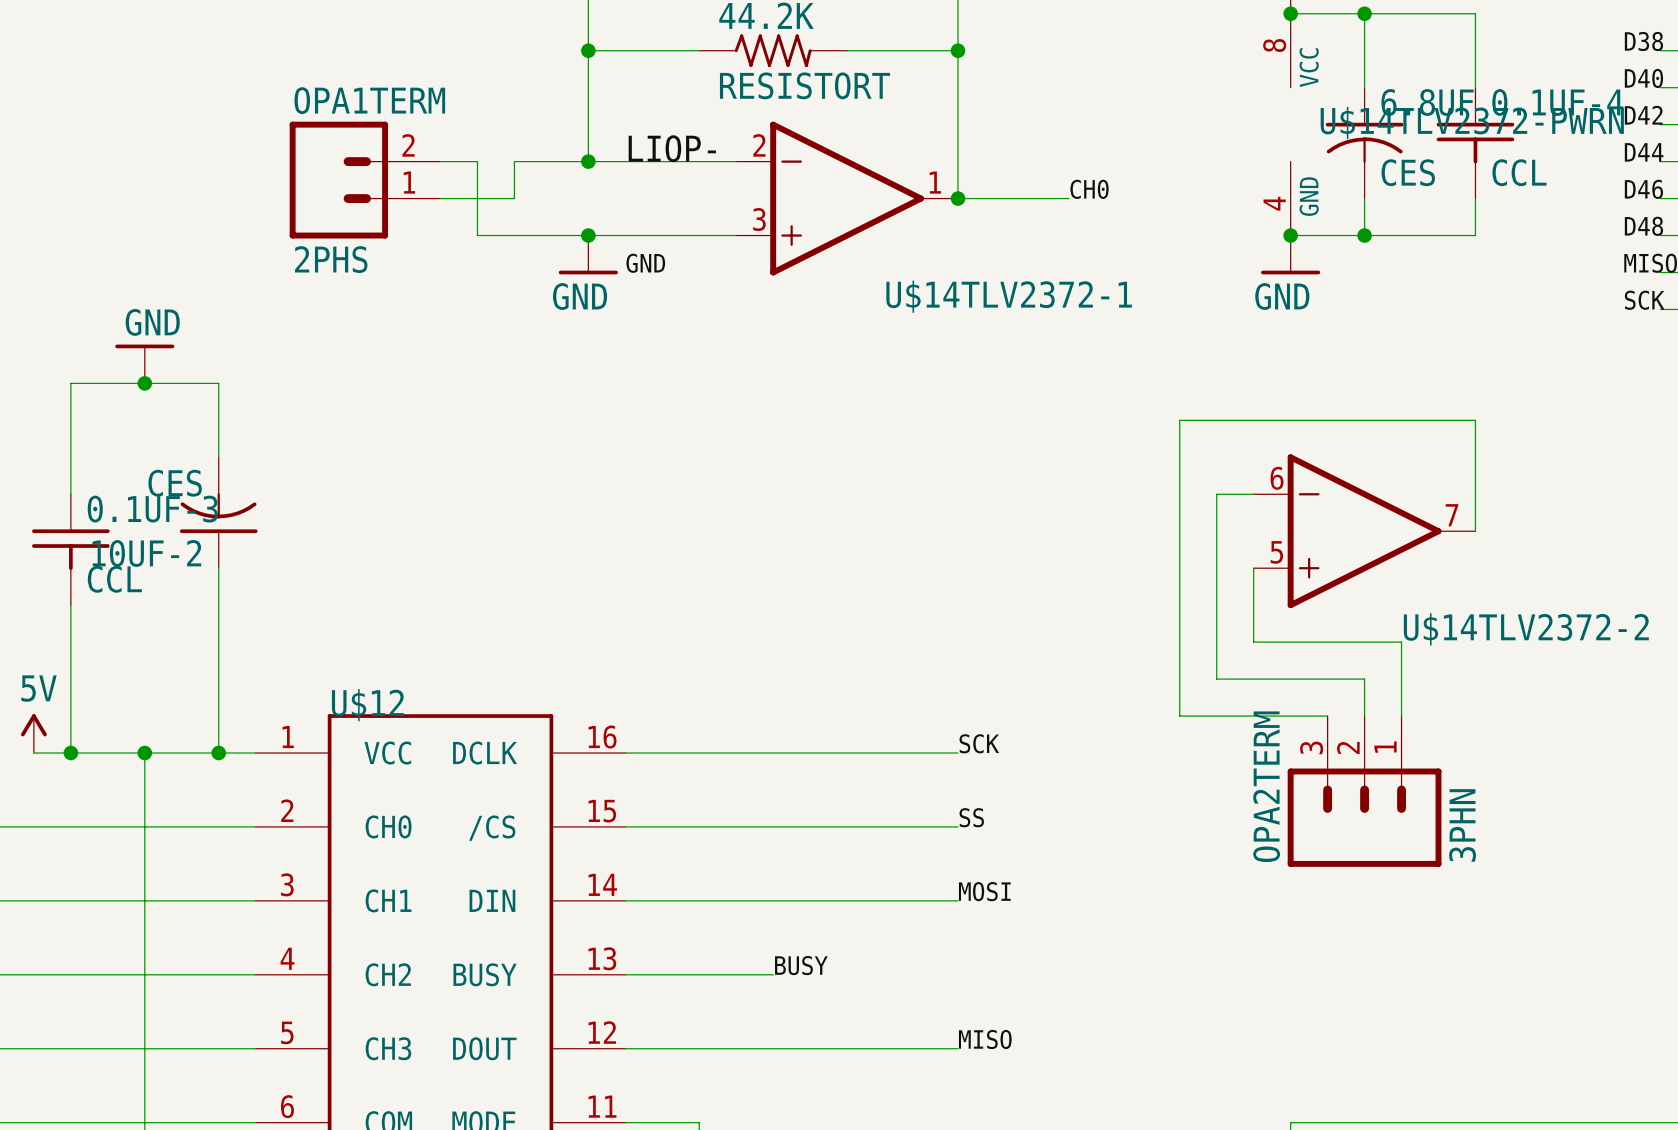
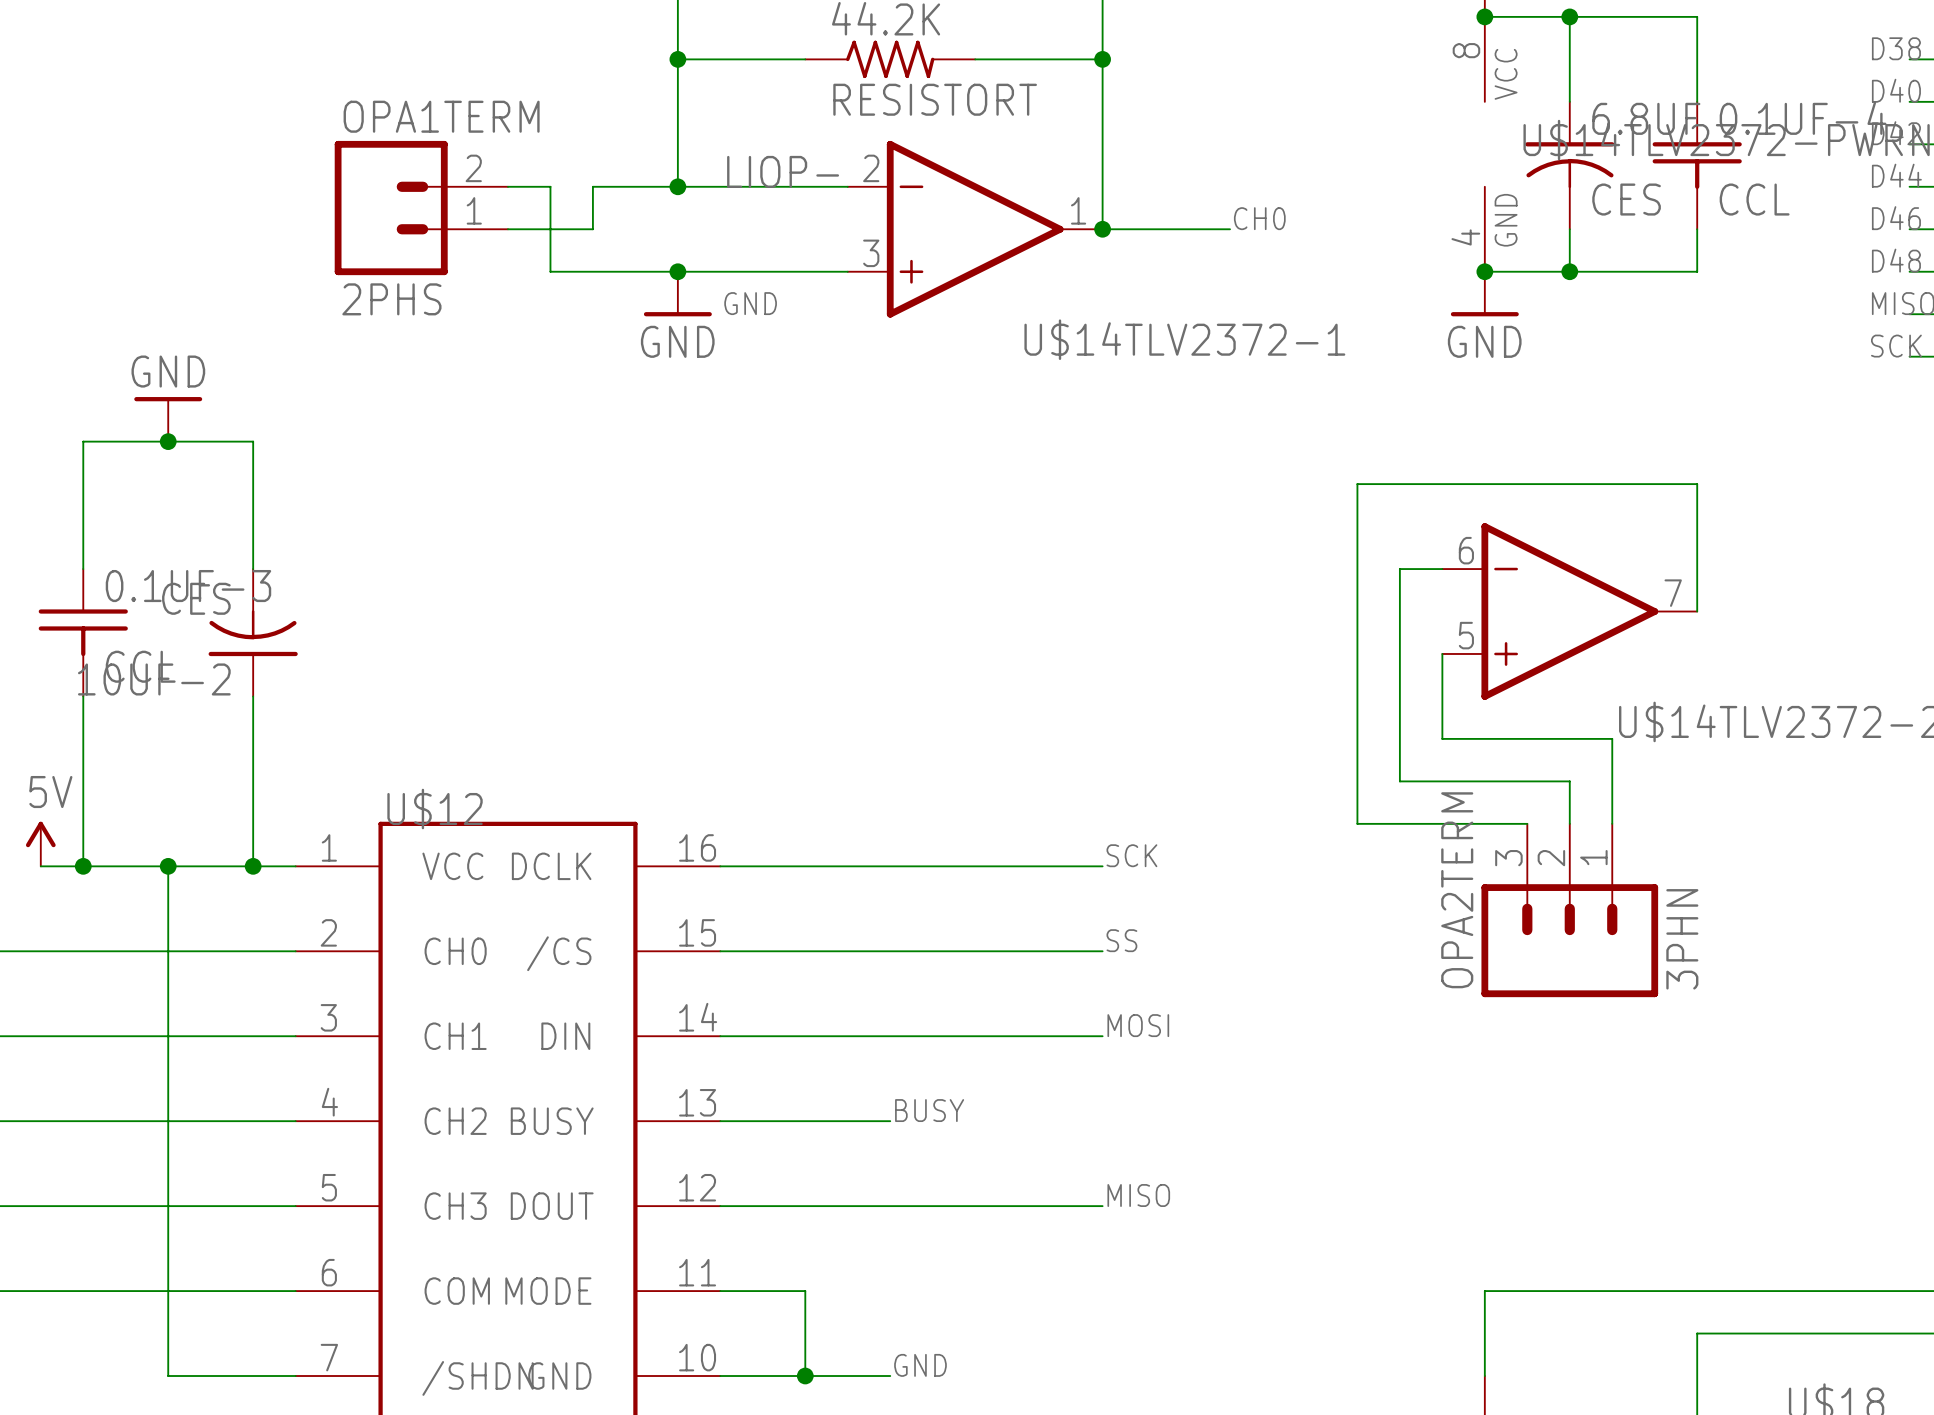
10UF-2 position: (218, 512) -> (253, 632)

